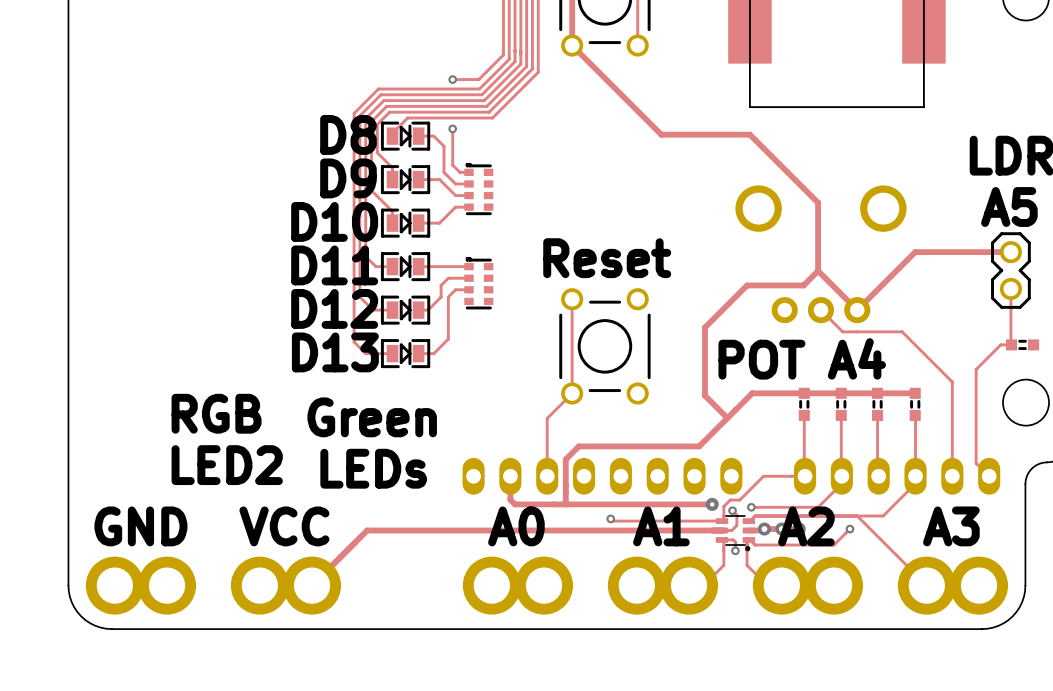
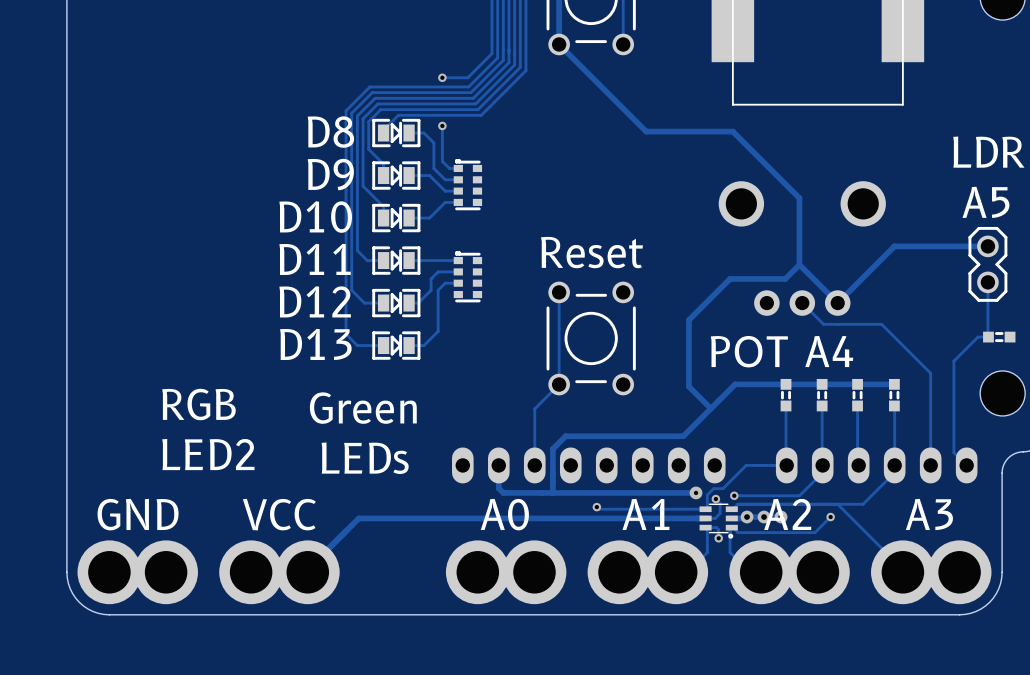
part footprint: [85, 556, 197, 615] -> [77, 540, 198, 605]
part footprint: [230, 556, 342, 615] -> [219, 540, 340, 605]
part footprint: [462, 556, 574, 615] -> [445, 540, 567, 605]
part footprint: [607, 556, 719, 615] -> [587, 540, 709, 605]
part footprint: [752, 556, 864, 615] -> [729, 540, 850, 605]
part footprint: [897, 556, 1009, 615] -> [871, 540, 992, 605]

